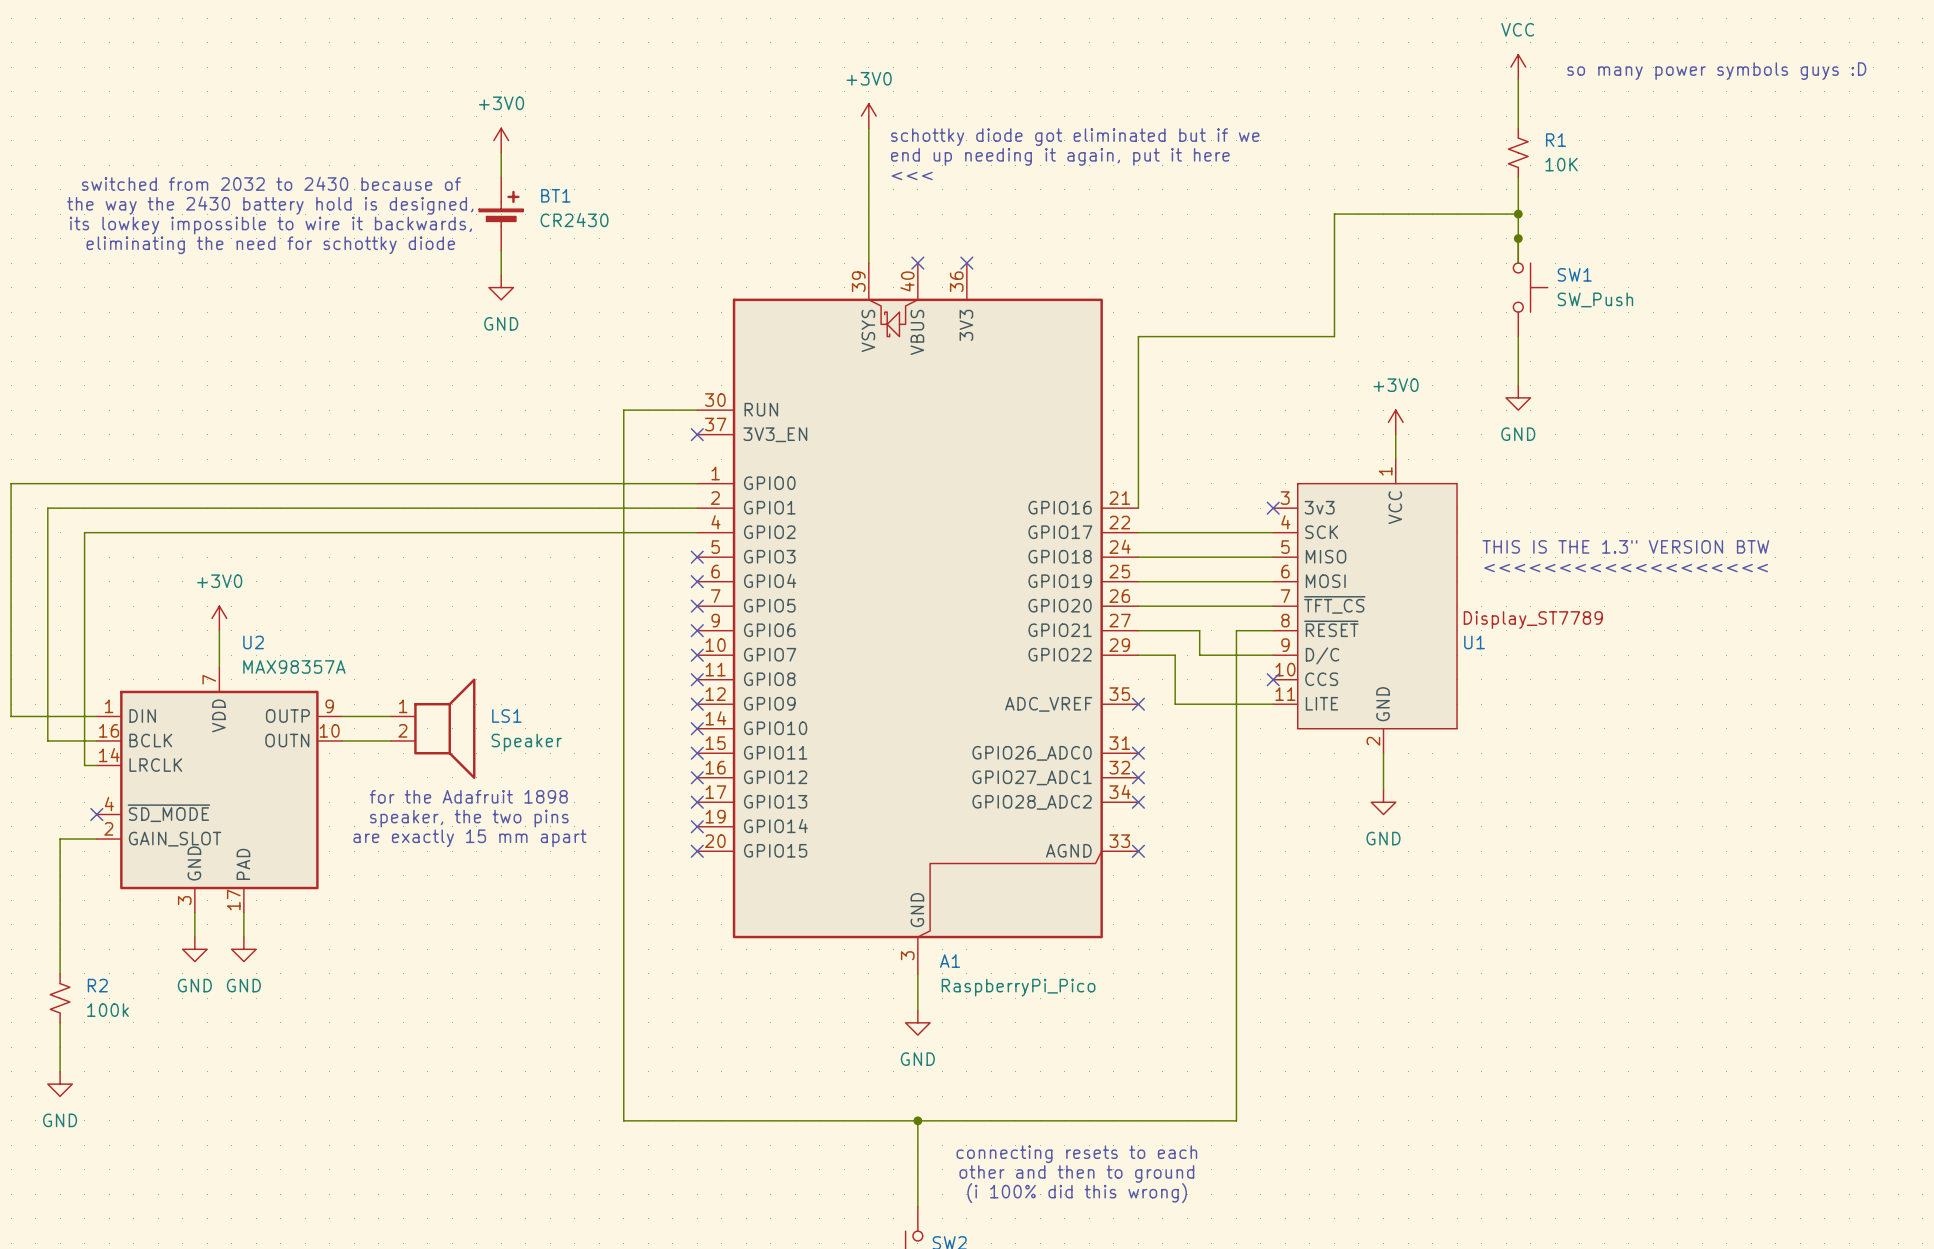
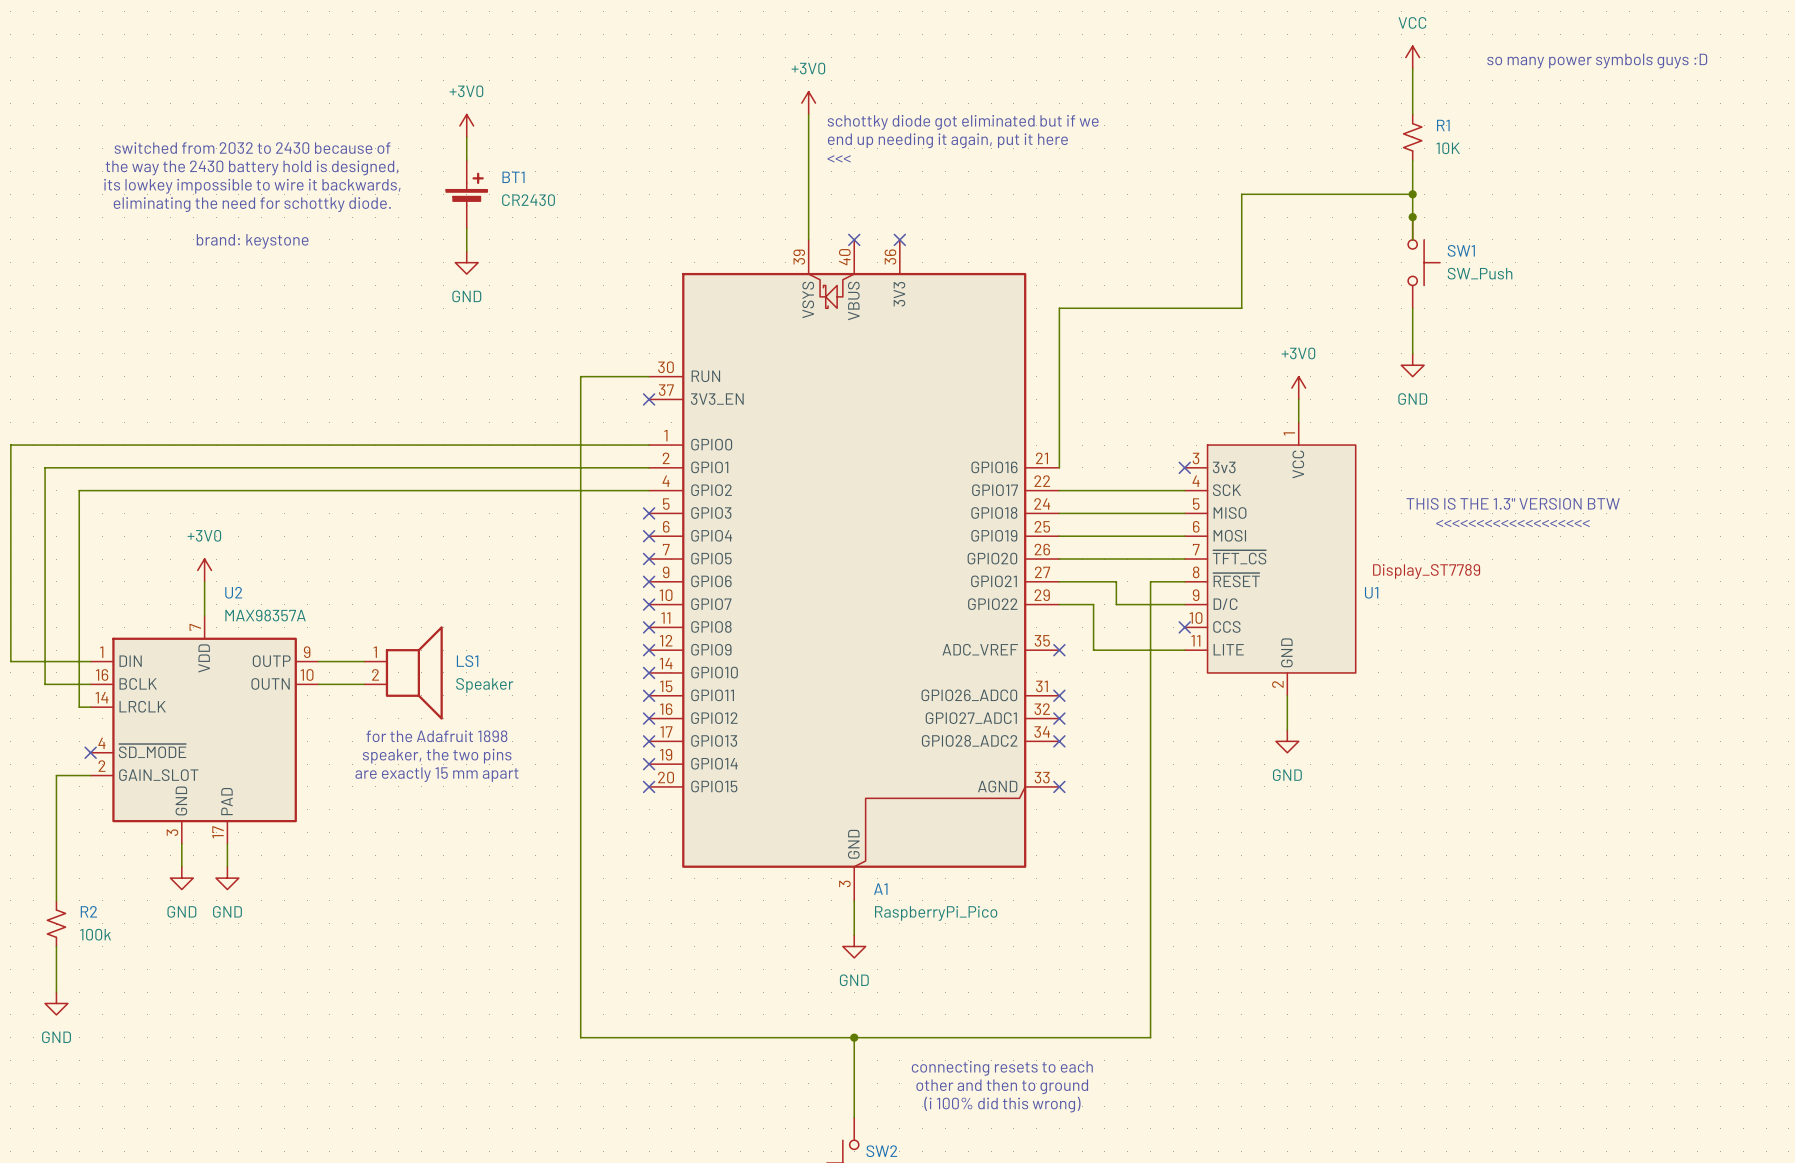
text: none -> switched from 2032 to 2430 because of (252, 148)
text: switched from 2032 to 2430 because of (271, 183) -> the way the 2430 battery hold is designed, (252, 167)
text: the way the 2430 battery hold is designed, (270, 205) -> its lowkey impossible to wire it backwards, (252, 186)
text: its lowkey impossible to wire it backwards, (270, 225) -> eliminating the need for schottky diode. (252, 204)
text: eliminating the need for schottky diode (270, 245) -> none
text: none -> brand: keystone (252, 241)

